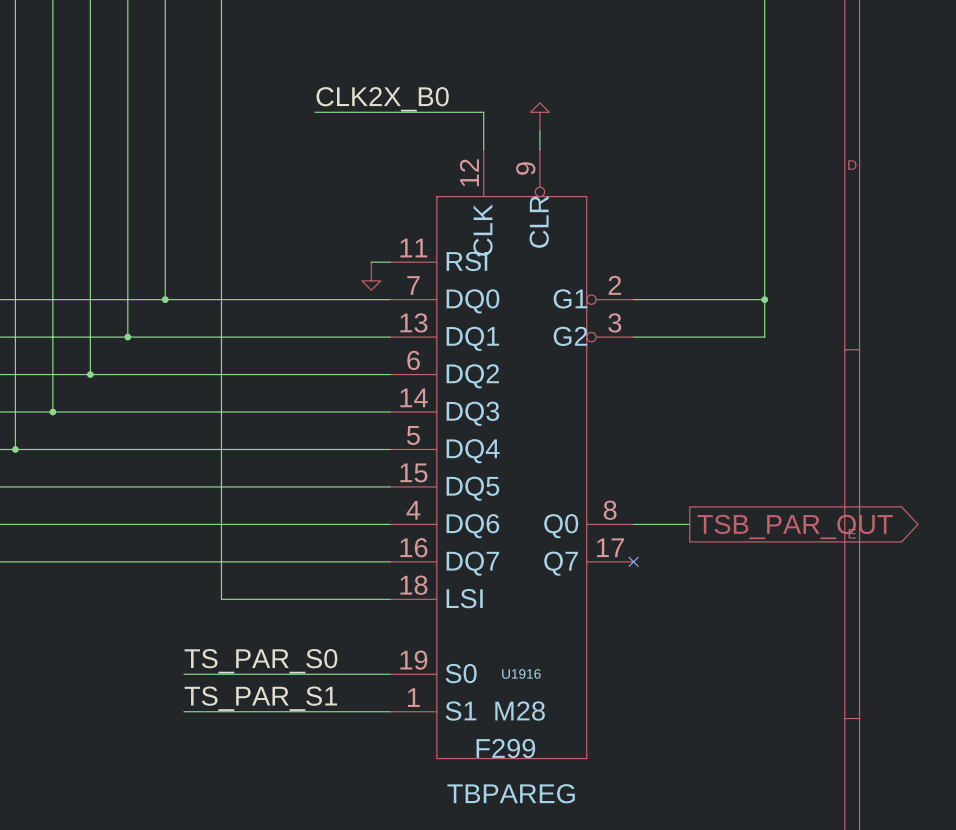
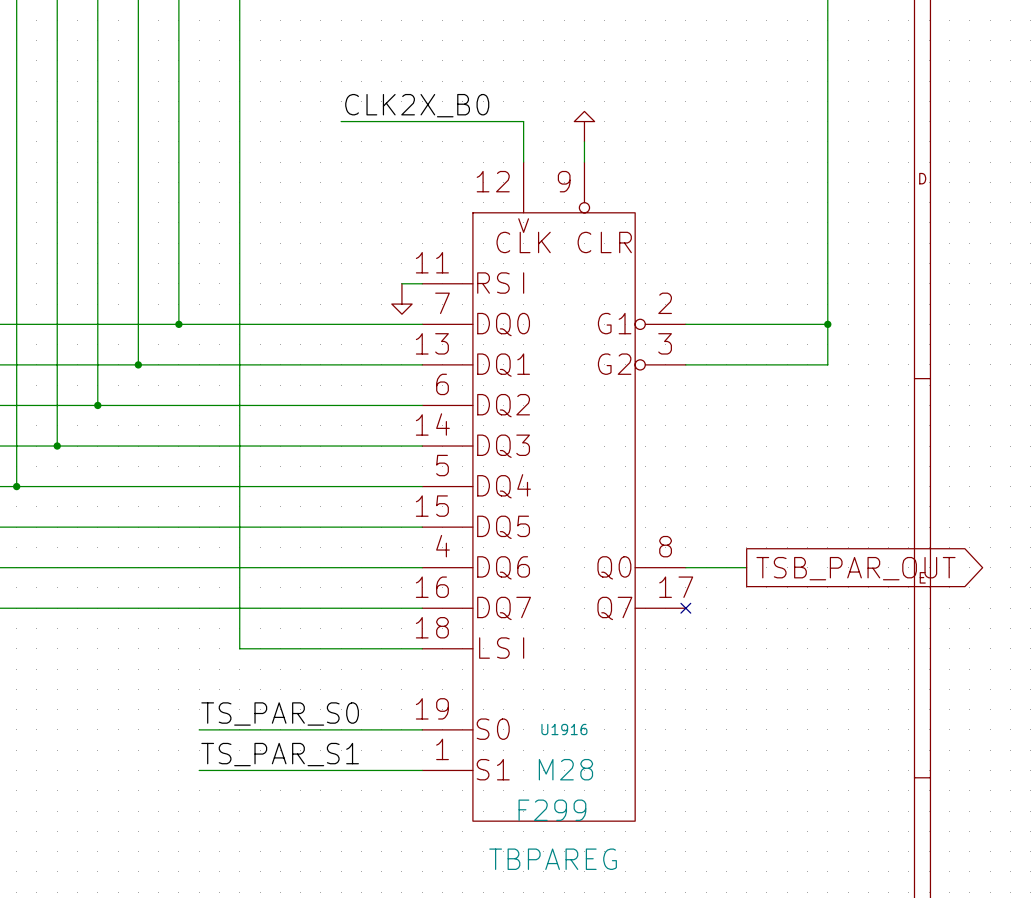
U1916 symbol: [390, 149, 634, 759] -> [422, 162, 686, 822]

